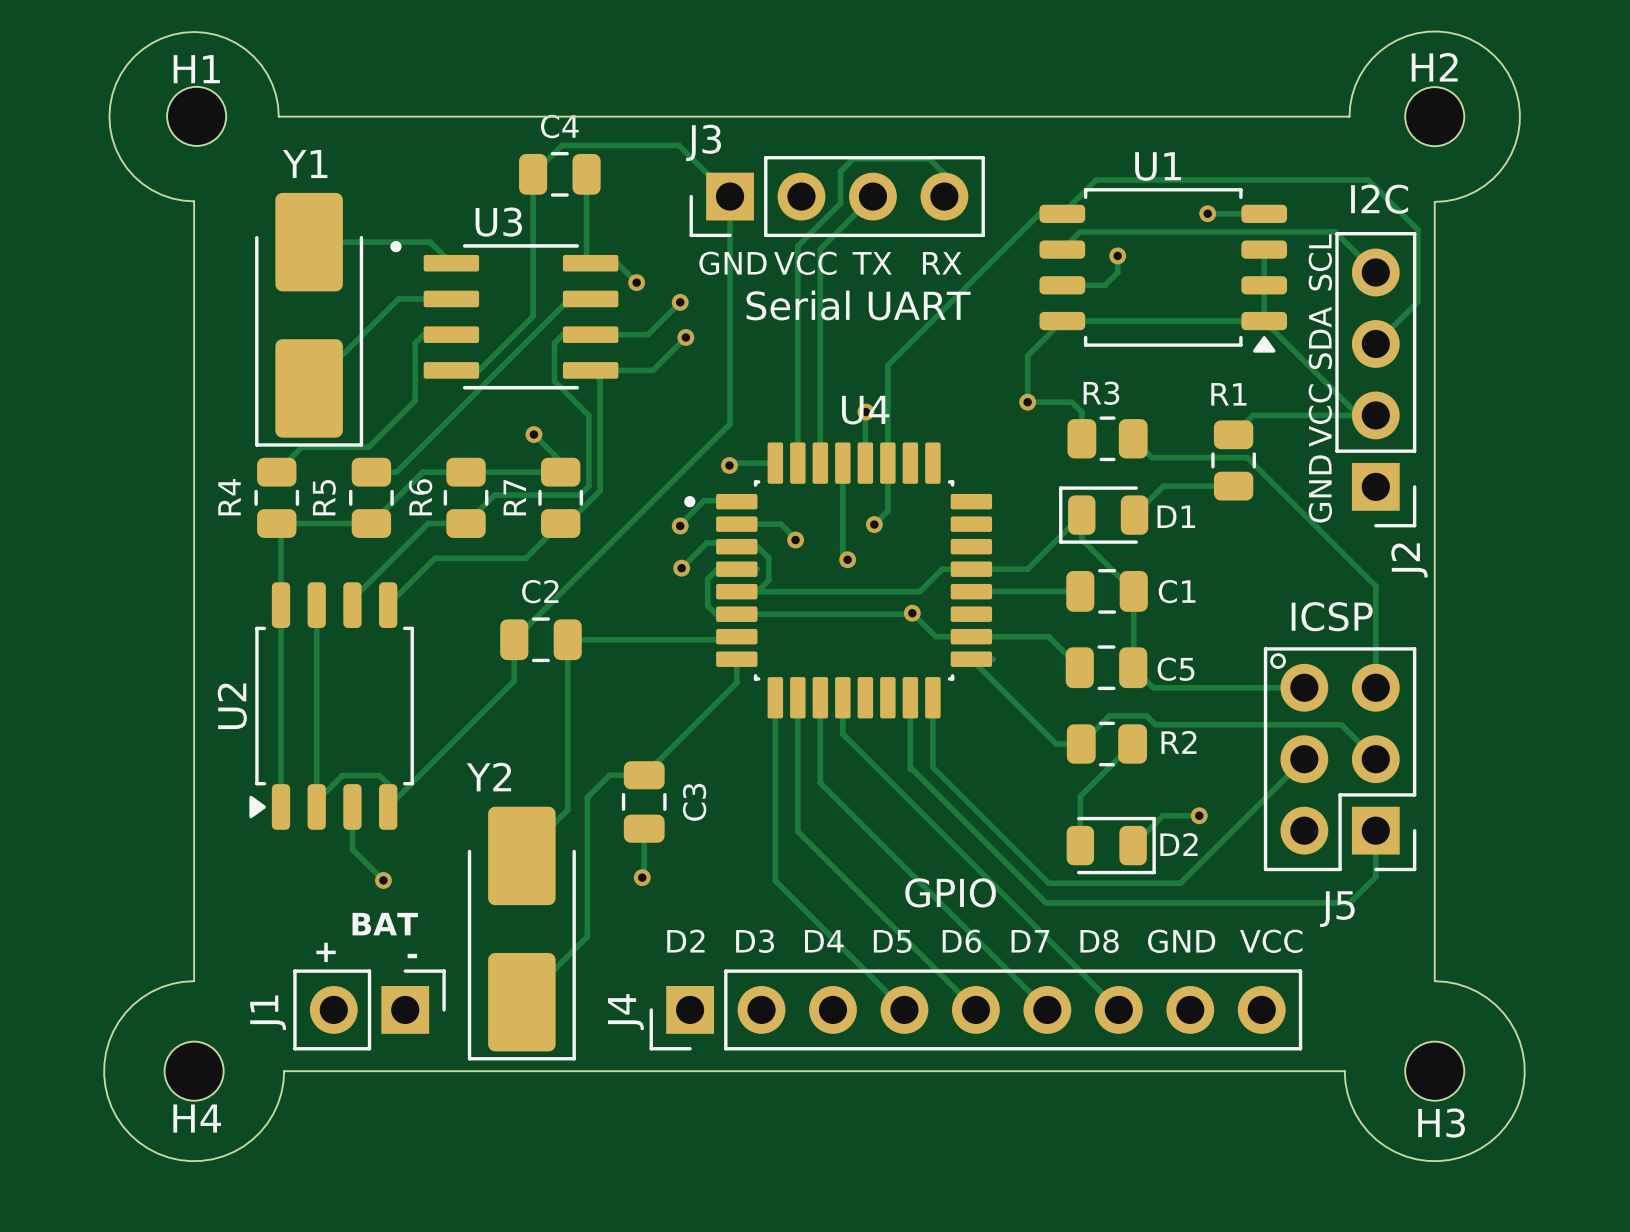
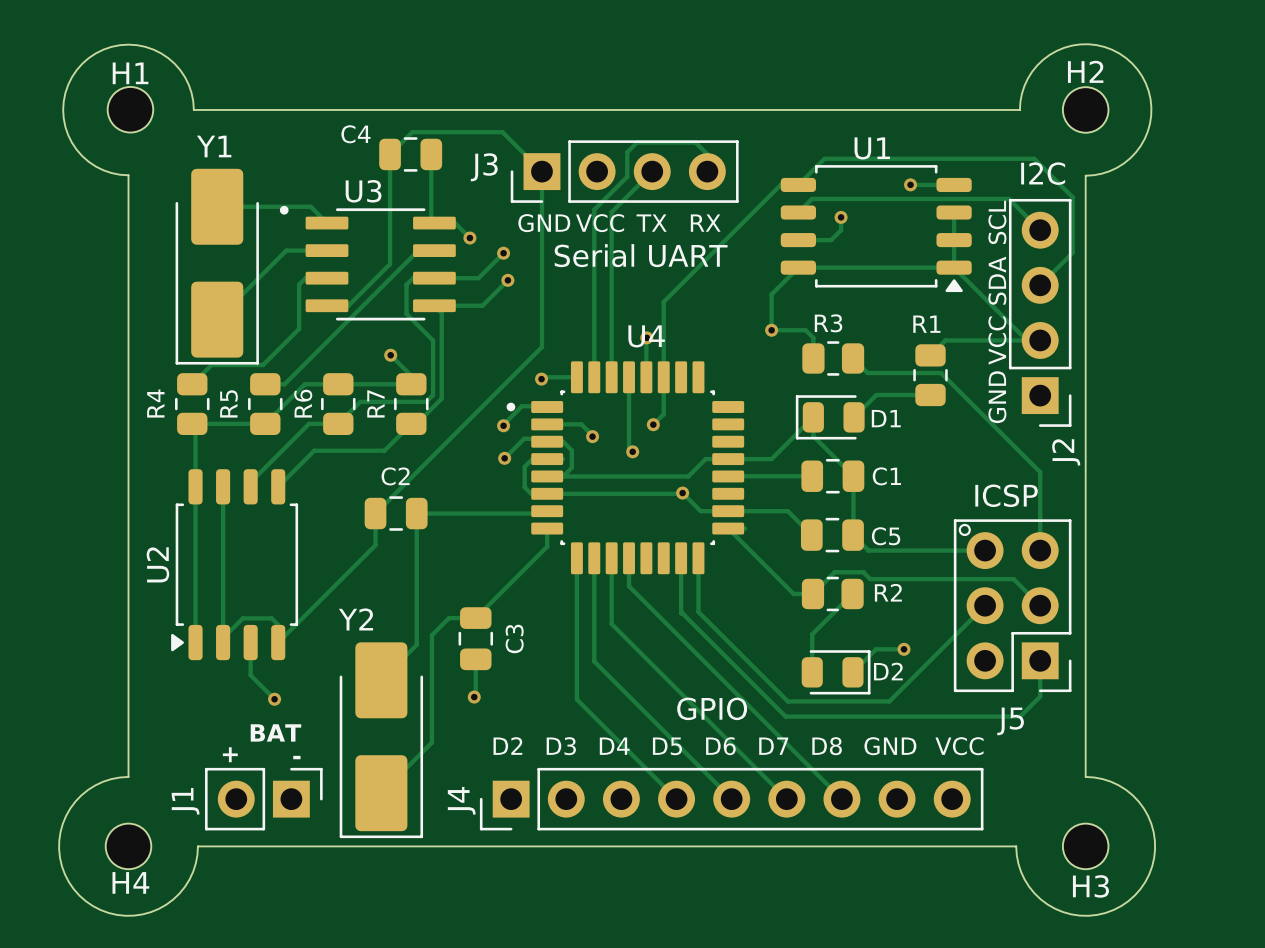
C4 name position: C4 (559, 126) -> C4 (355, 134)
J3 name position: J3 (703, 142) -> J3 (484, 167)

